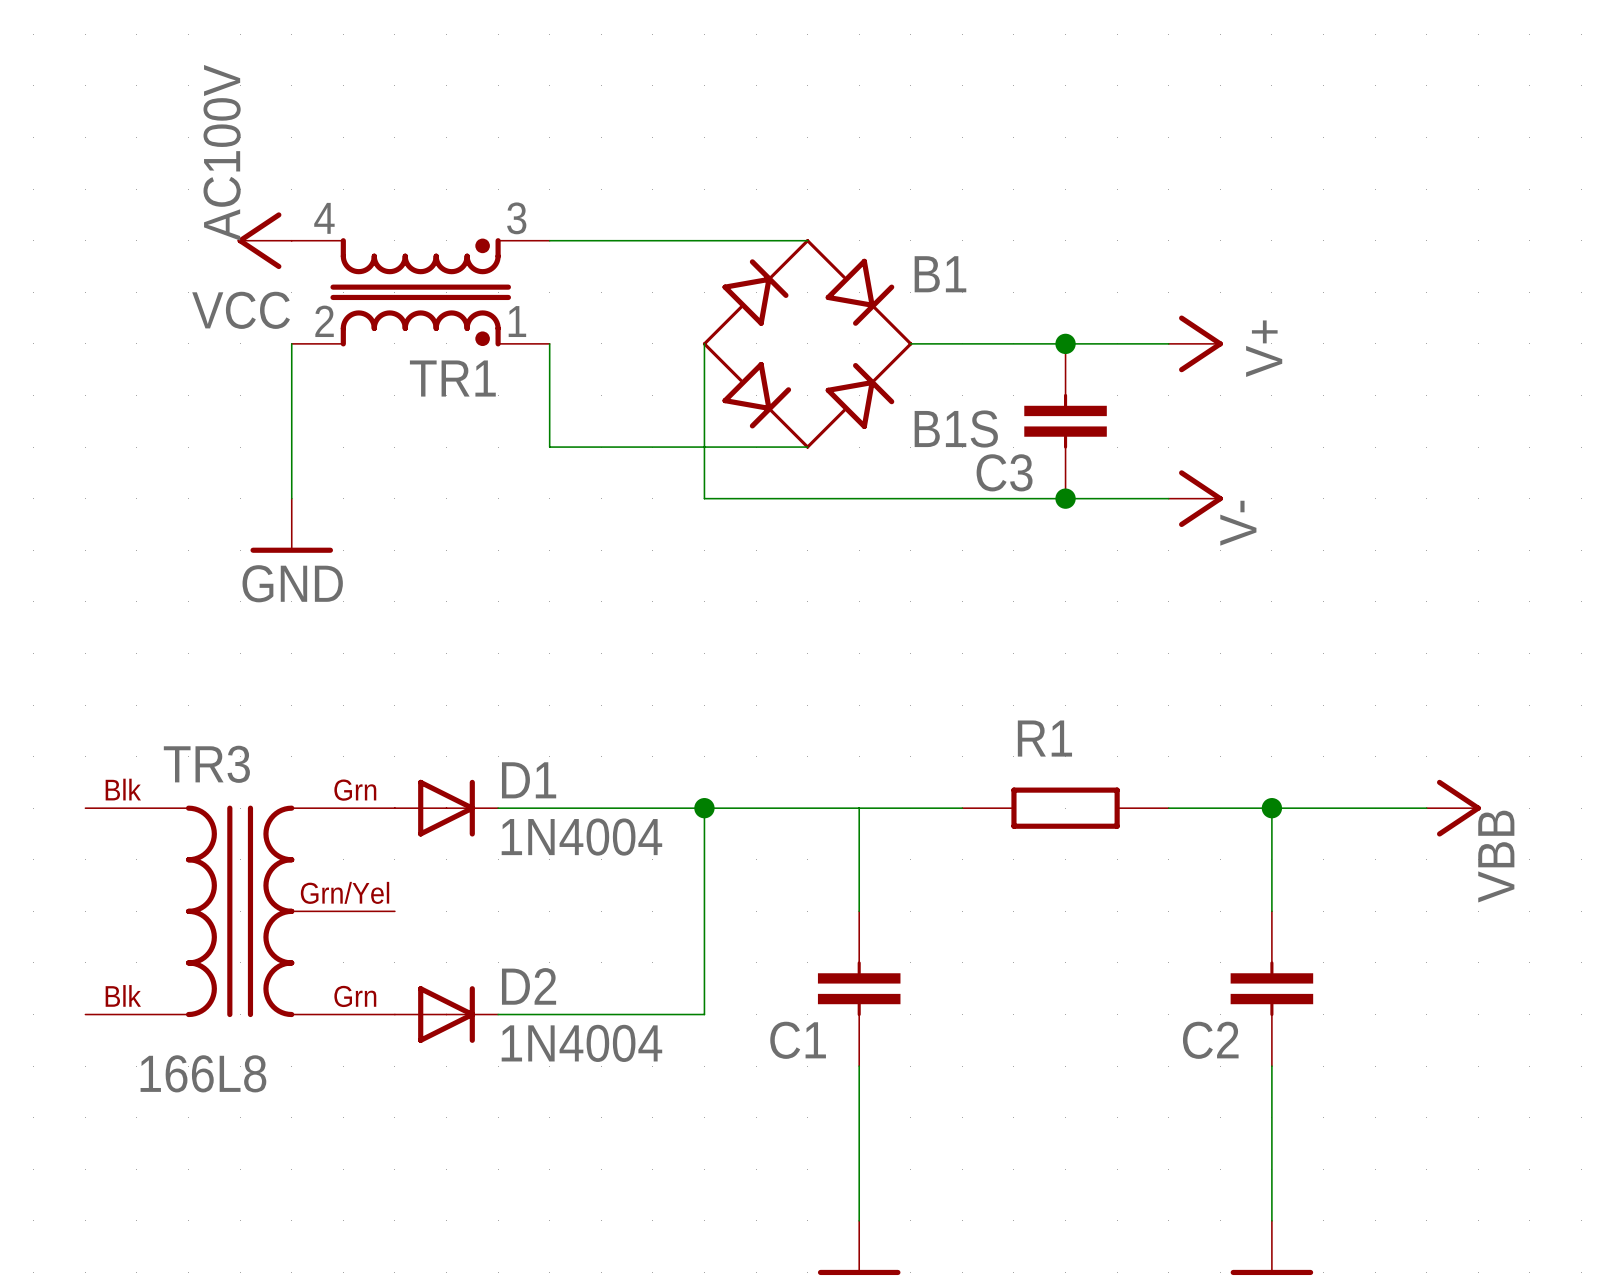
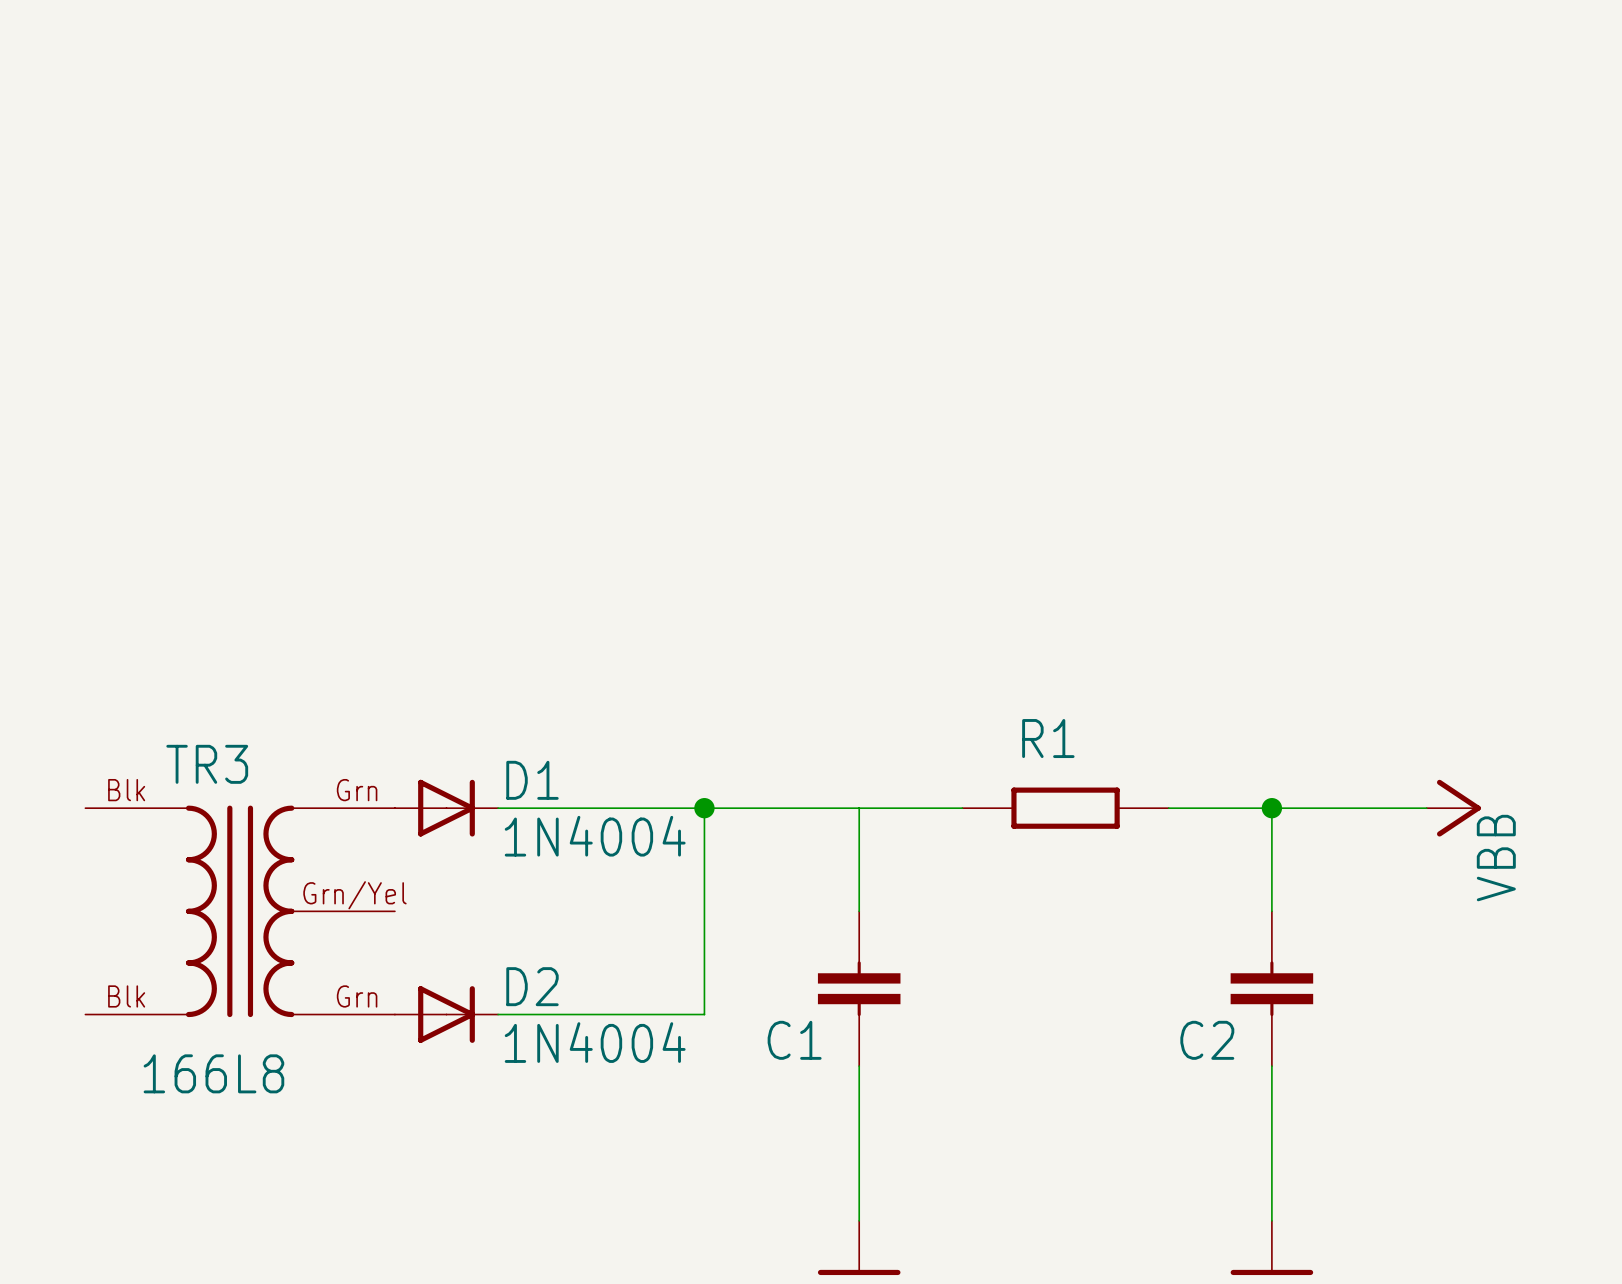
power symbol: VCC (264, 240) -> none
wire: (549, 240) (807, 240) -> none
TR1: (420, 292) -> none
wire: (291, 343) (291, 498) -> none
wire: (549, 343) (549, 447) (807, 447) -> none
wire: (704, 343) (704, 498) (1168, 498) -> none
B1: B1S (807, 343) -> none
wire: (910, 343) (1168, 343) -> none
junction: (1065, 343) -> none
power symbol: V+ (1195, 343) -> none
C3: (1065, 421) -> none
junction: (1065, 498) -> none
power symbol: (1195, 498) -> none
power symbol: GND (291, 525) -> none

